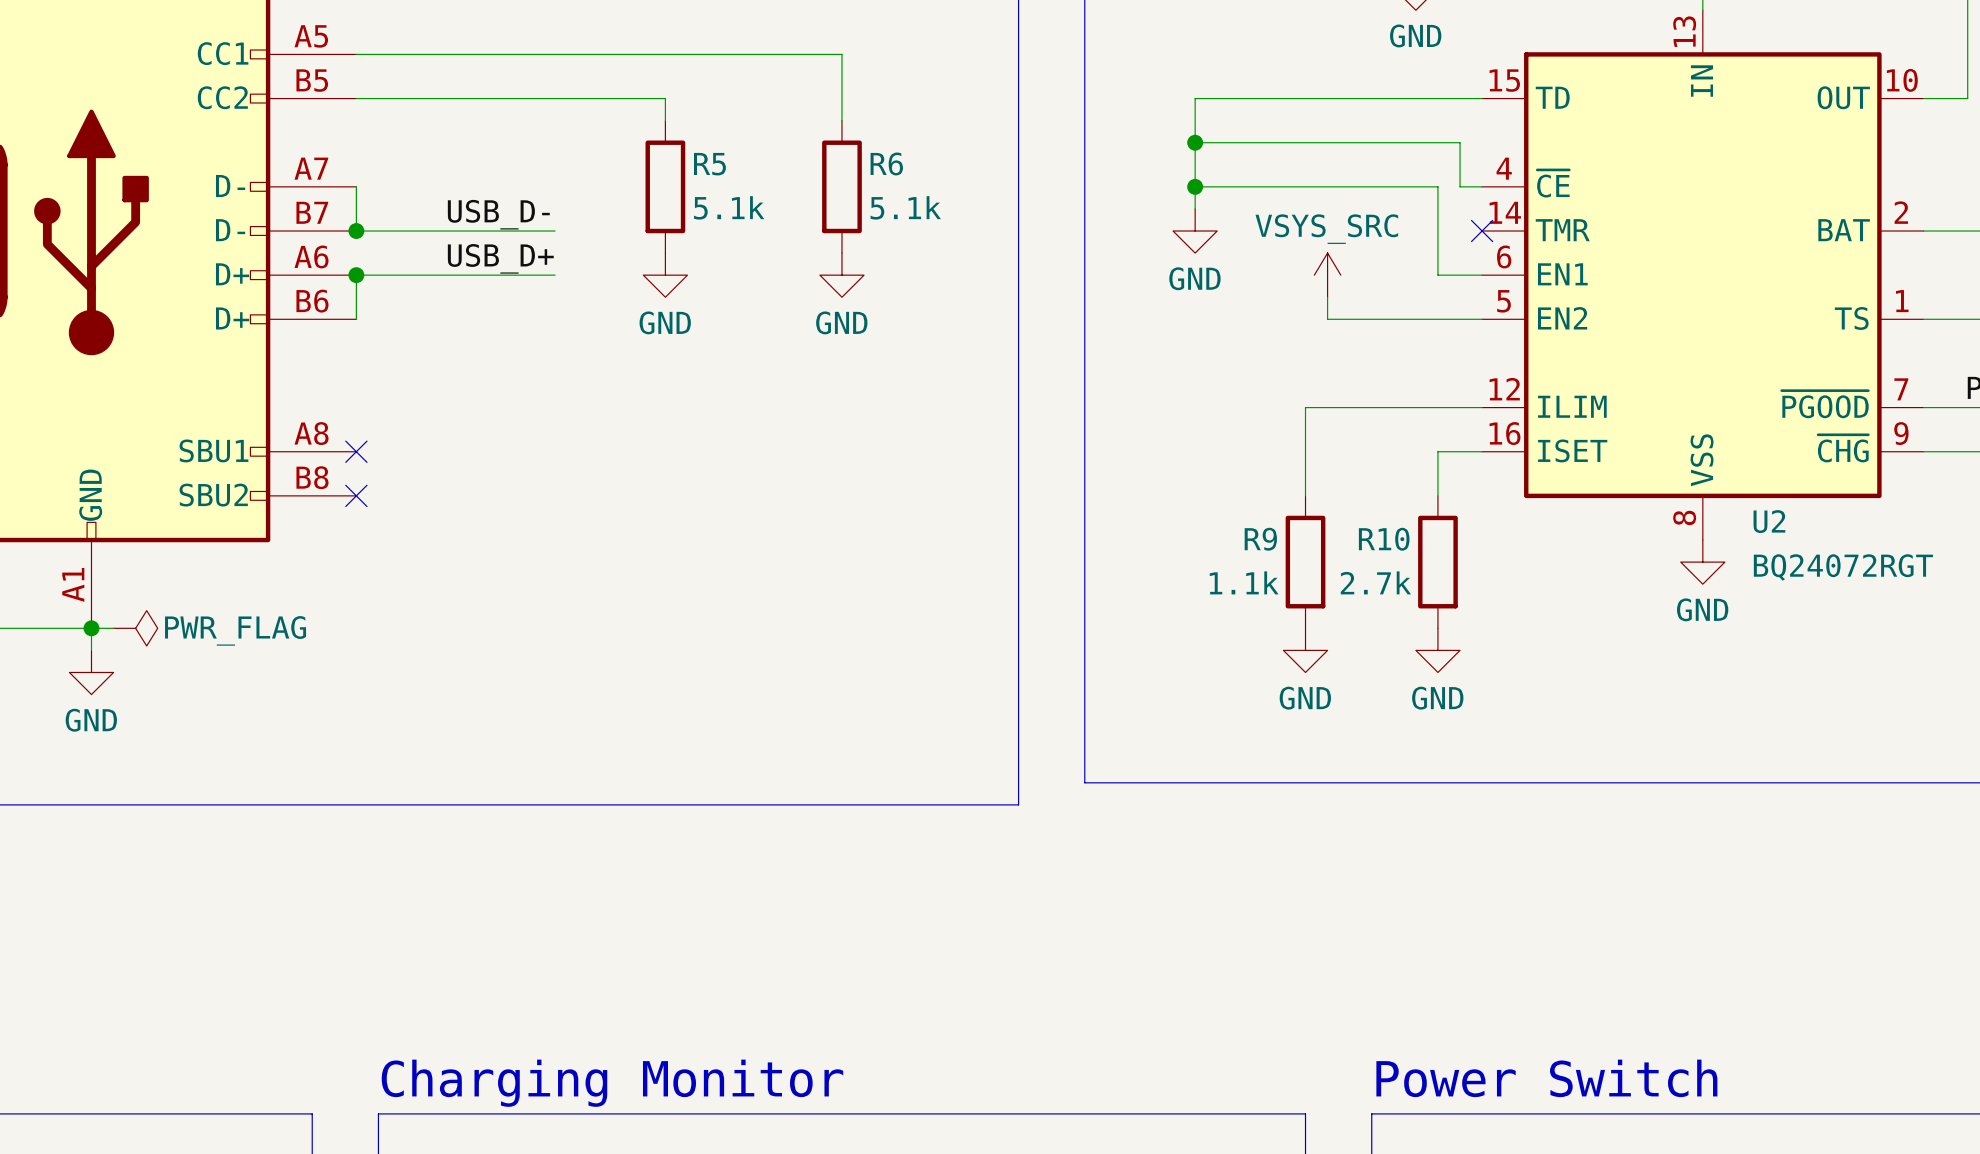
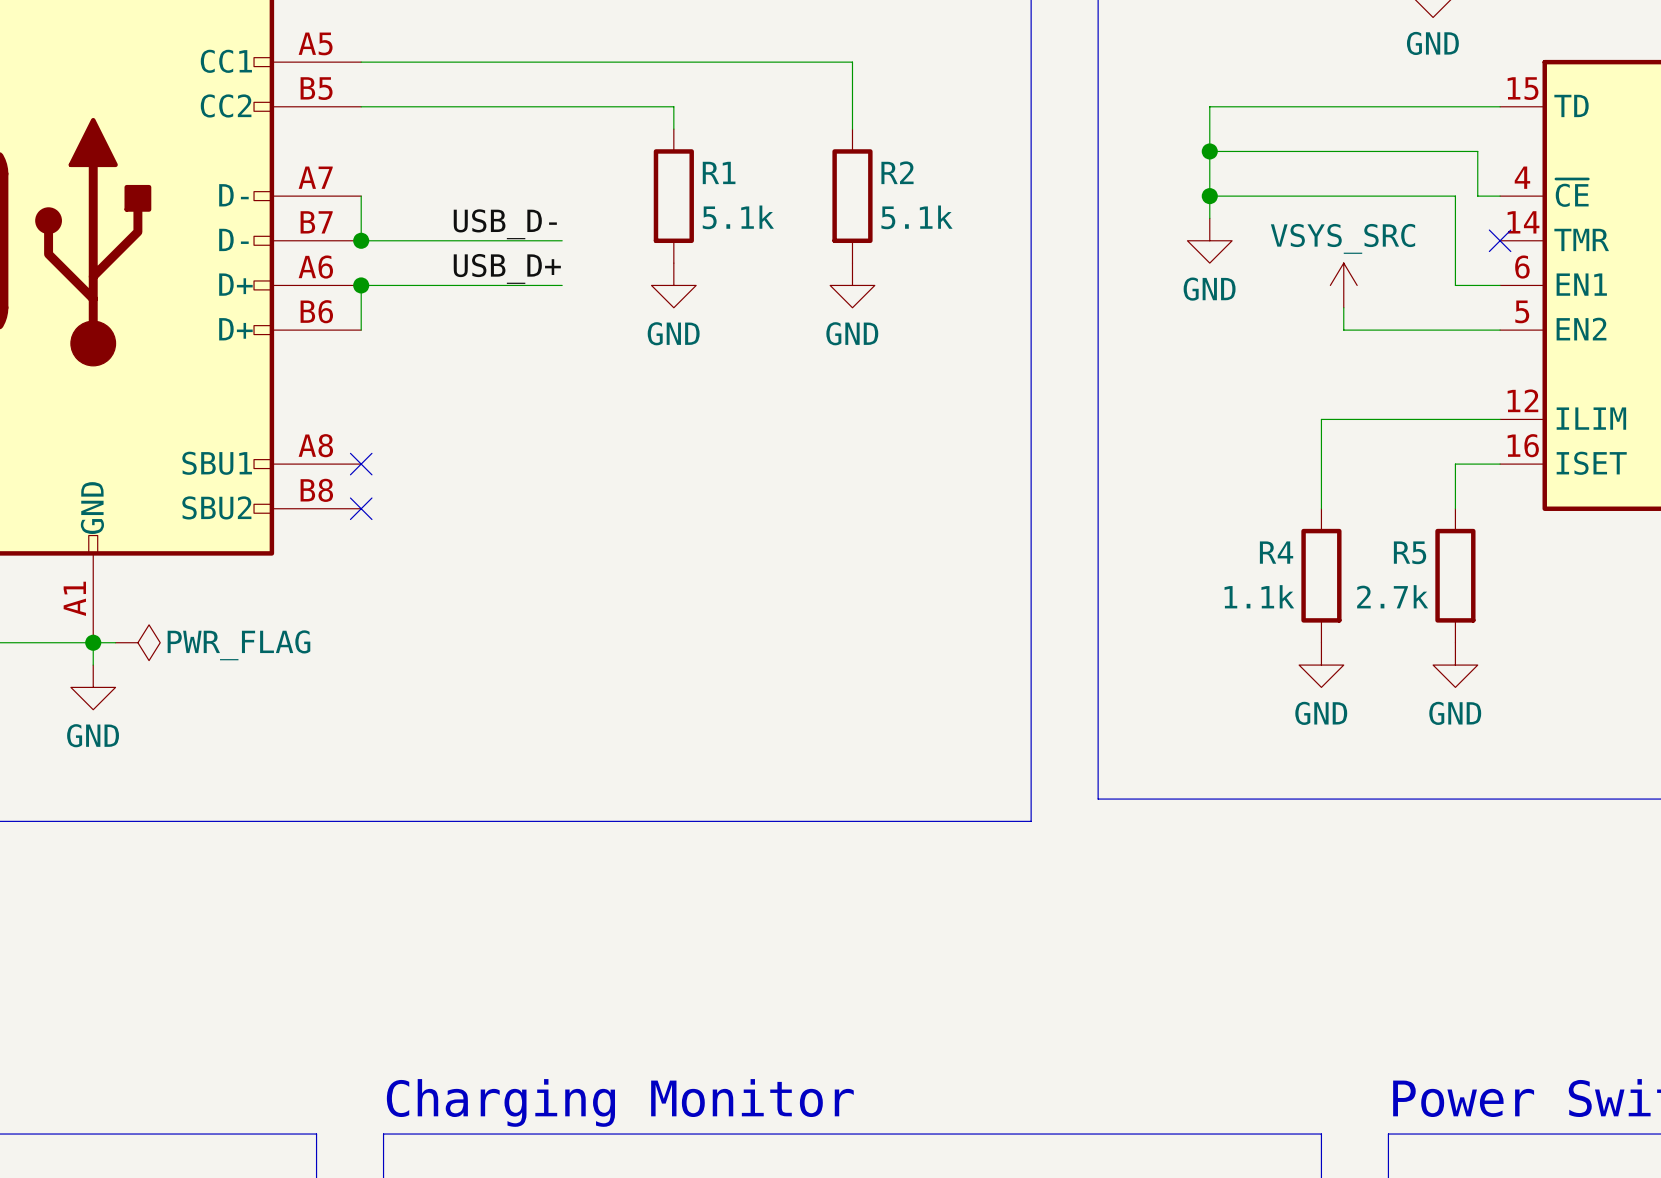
R6 name: R6 (886, 163) -> R2 (897, 172)
R5 name: R5 (709, 164) -> R1 (719, 172)
R9 name: R9 (1260, 539) -> R4 (1276, 552)
R10 name: R10 (1384, 539) -> R5 (1410, 552)

